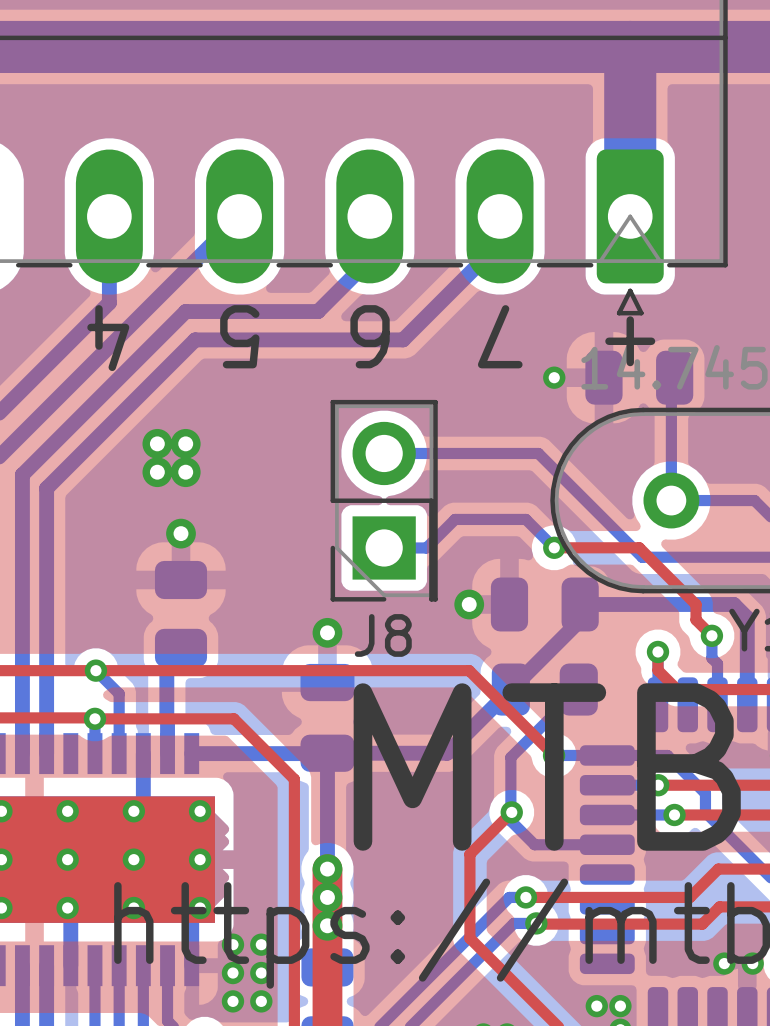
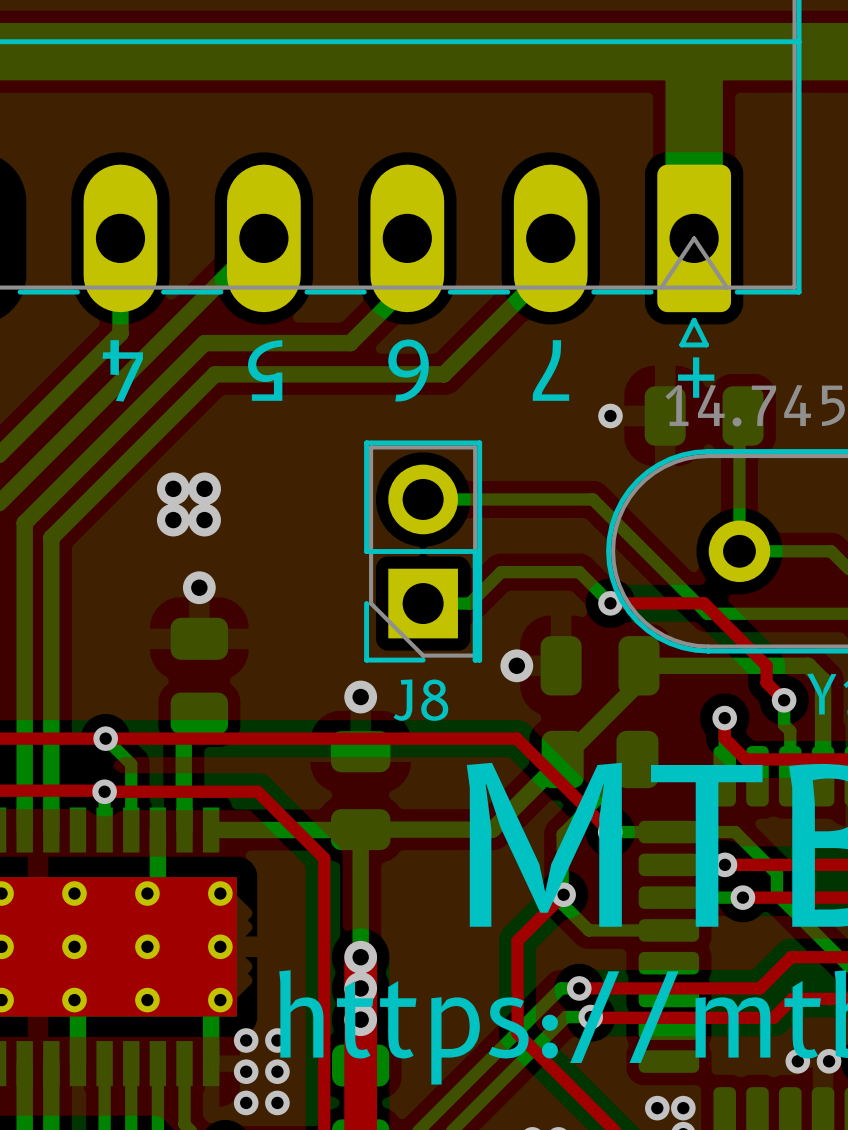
via: none -> (246, 1040)
via: (232, 944) -> none
via: none -> (277, 1040)
via: (261, 944) -> none
via: none -> (246, 1071)
via: (232, 973) -> none
via: none -> (277, 1071)
via: (261, 973) -> none
via: none -> (246, 1102)
via: (232, 1001) -> none
via: none -> (277, 1102)
via: (261, 1001) -> none

